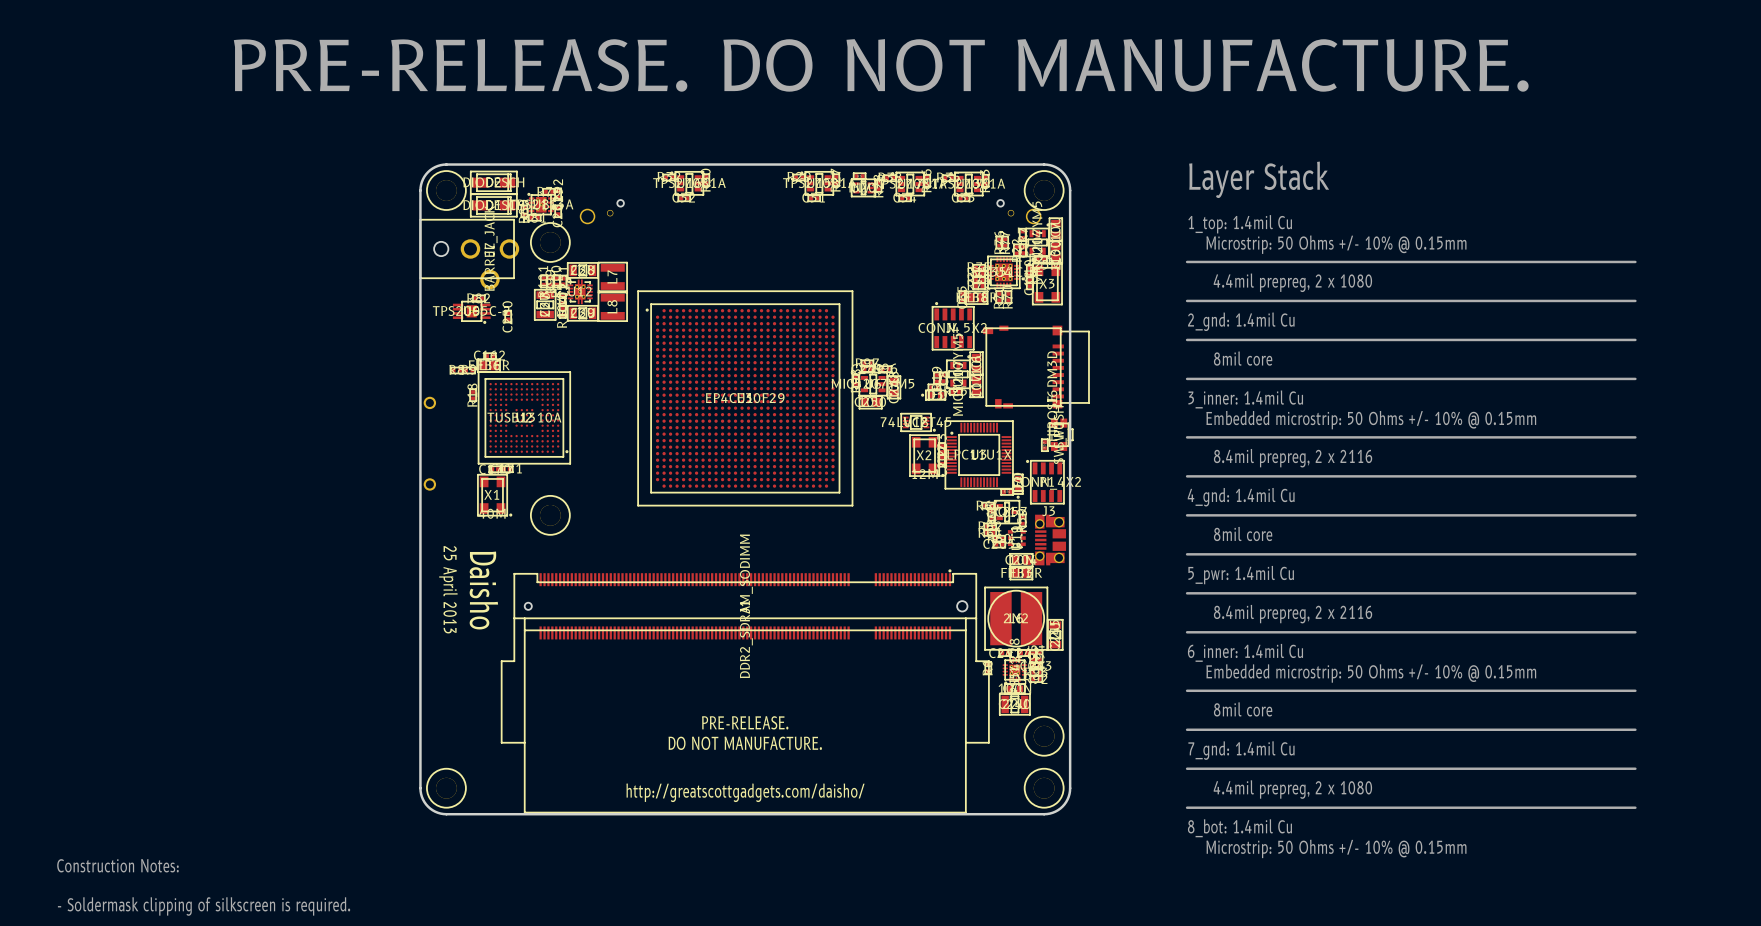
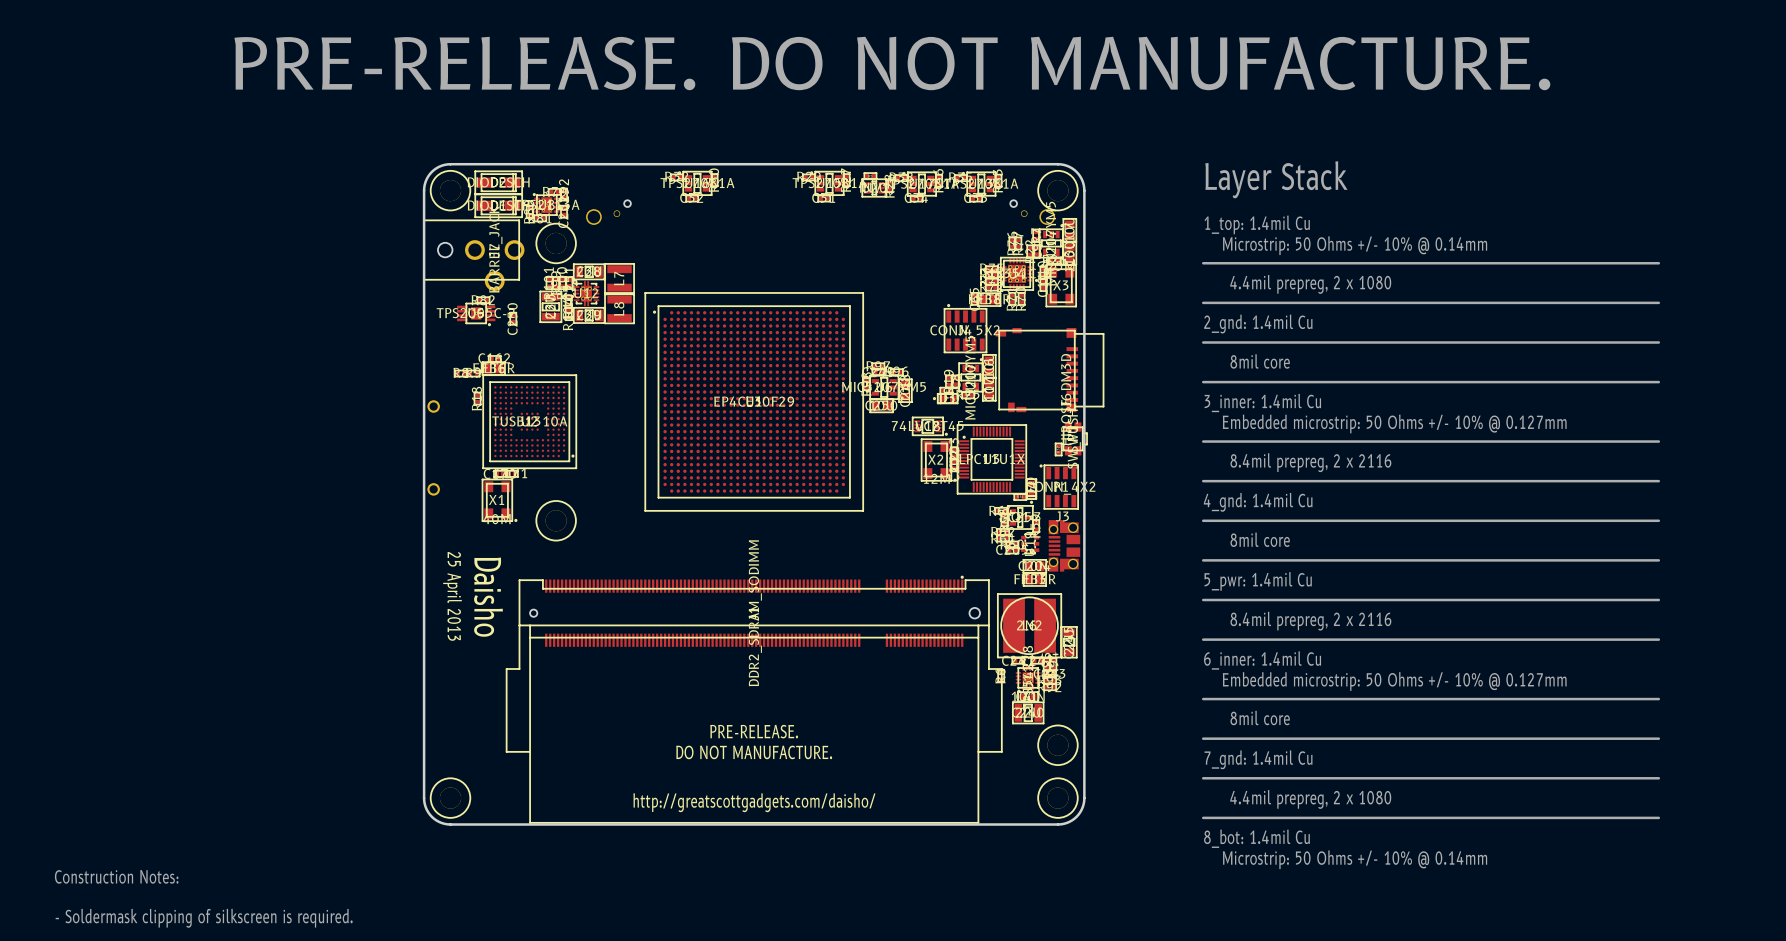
text: Microstrip: 50 Ohms +/- 10% @ 0.15mm (1336, 244) -> Microstrip: 50 Ohms +/- 10% @ 0.14mm (1355, 245)
text: Embedded microstrip: 50 Ohms +/- 10% @ 0.15mm (1371, 420) -> Embedded microstrip: 50 Ohms +/- 10% @ 0.127mm (1394, 423)
text: Embedded microstrip: 50 Ohms +/- 10% @ 0.15mm (1371, 673) -> Embedded microstrip: 50 Ohms +/- 10% @ 0.127mm (1394, 681)
text: Microstrip: 50 Ohms +/- 10% @ 0.15mm (1336, 848) -> Microstrip: 50 Ohms +/- 10% @ 0.14mm (1355, 859)

